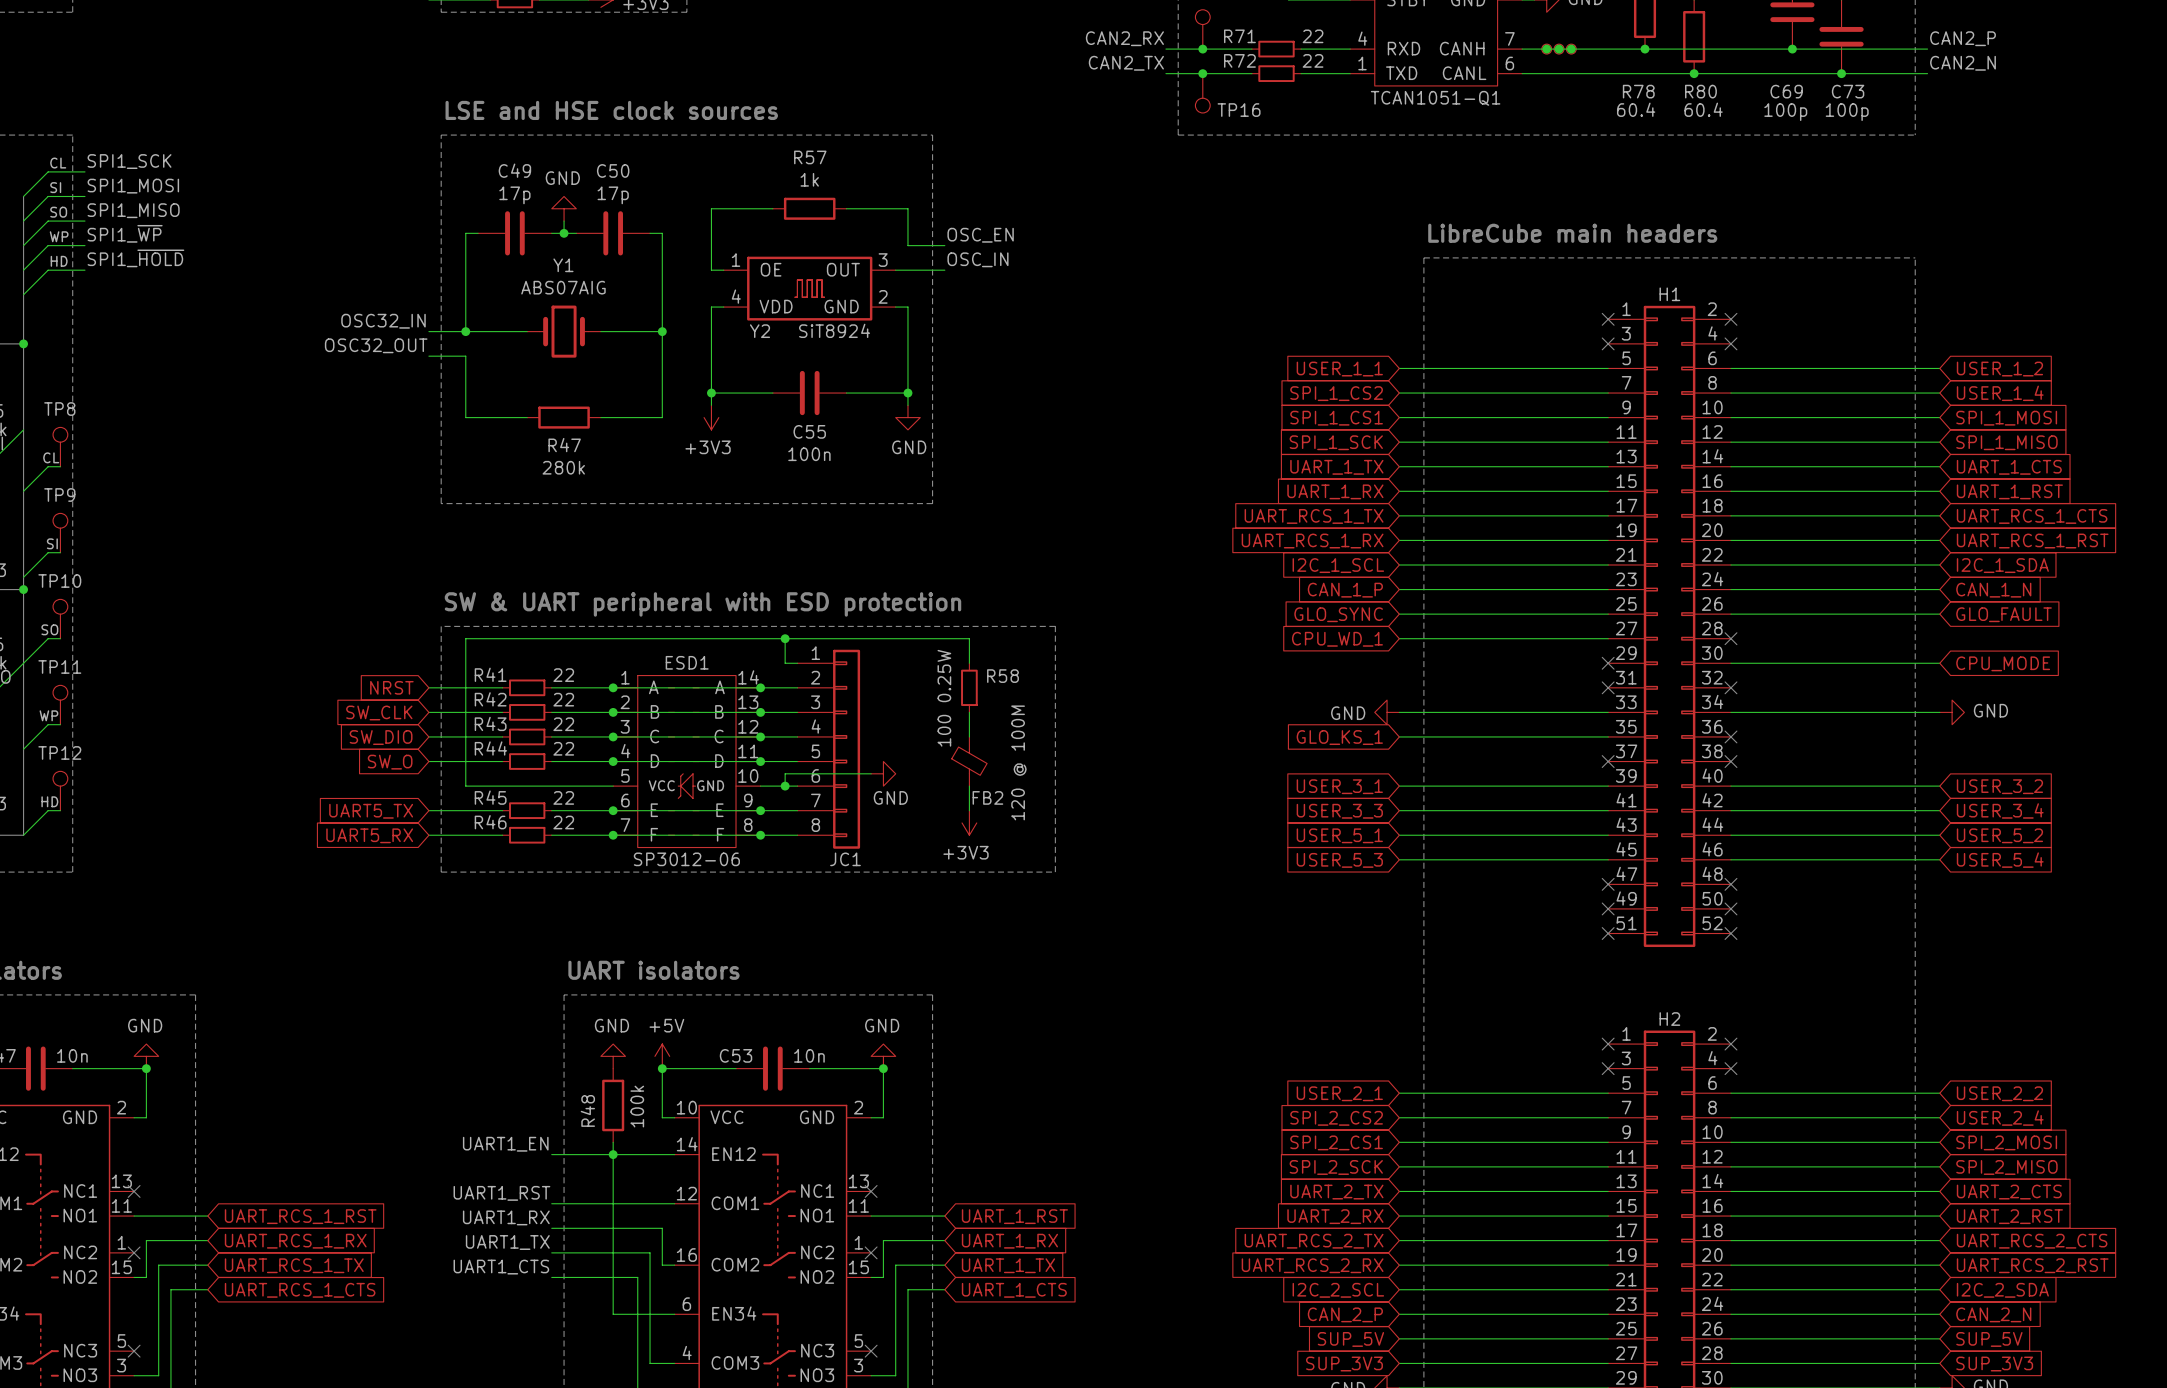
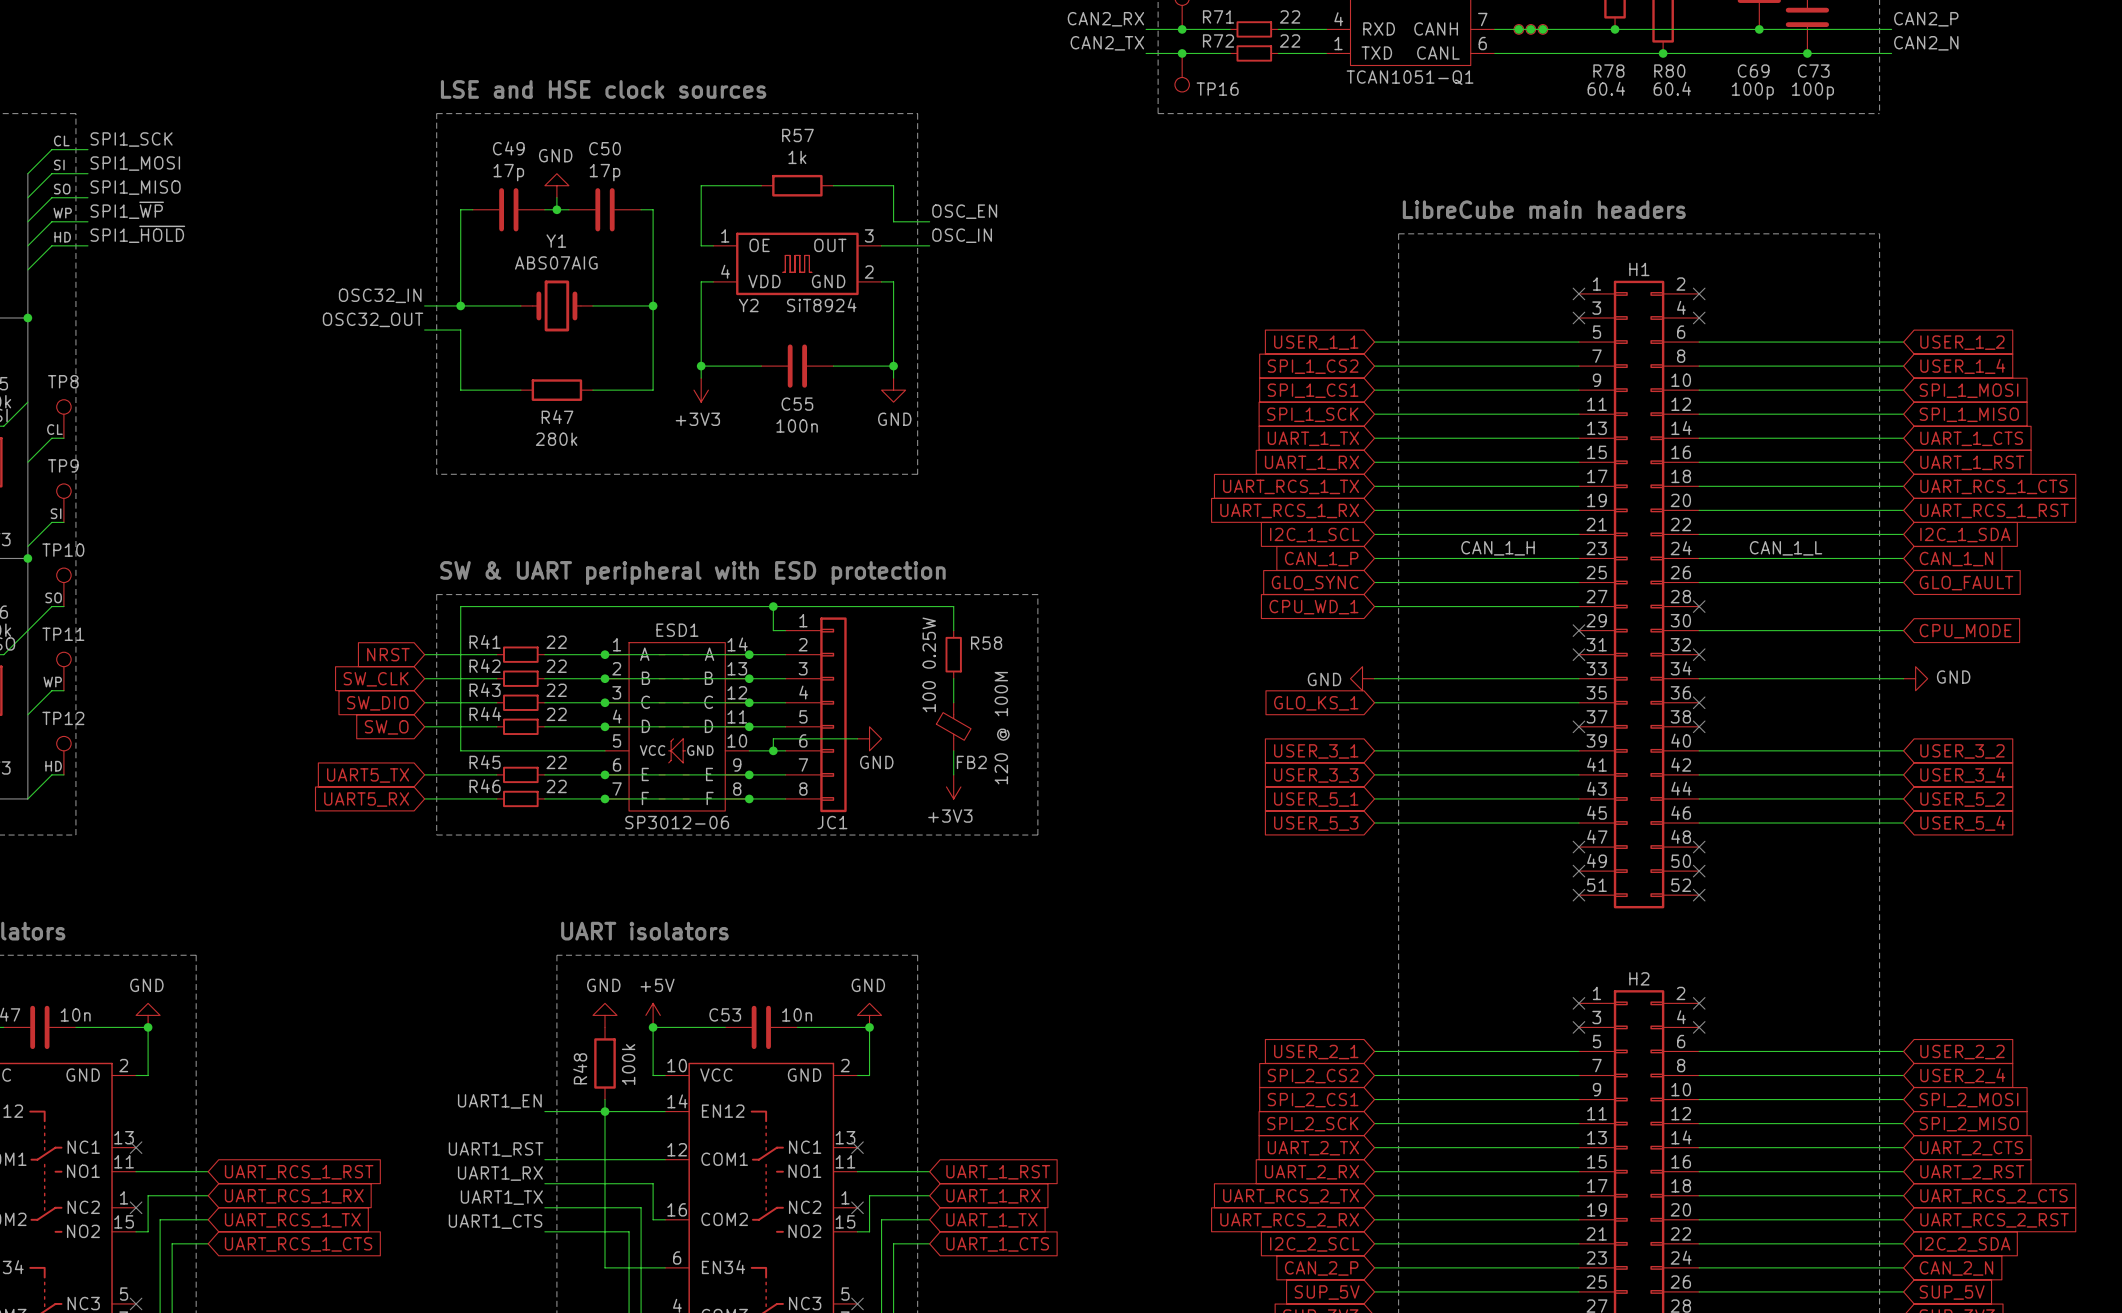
label: none -> CAN_1_H (1498, 548)
label: none -> CAN_1_L (1786, 548)

